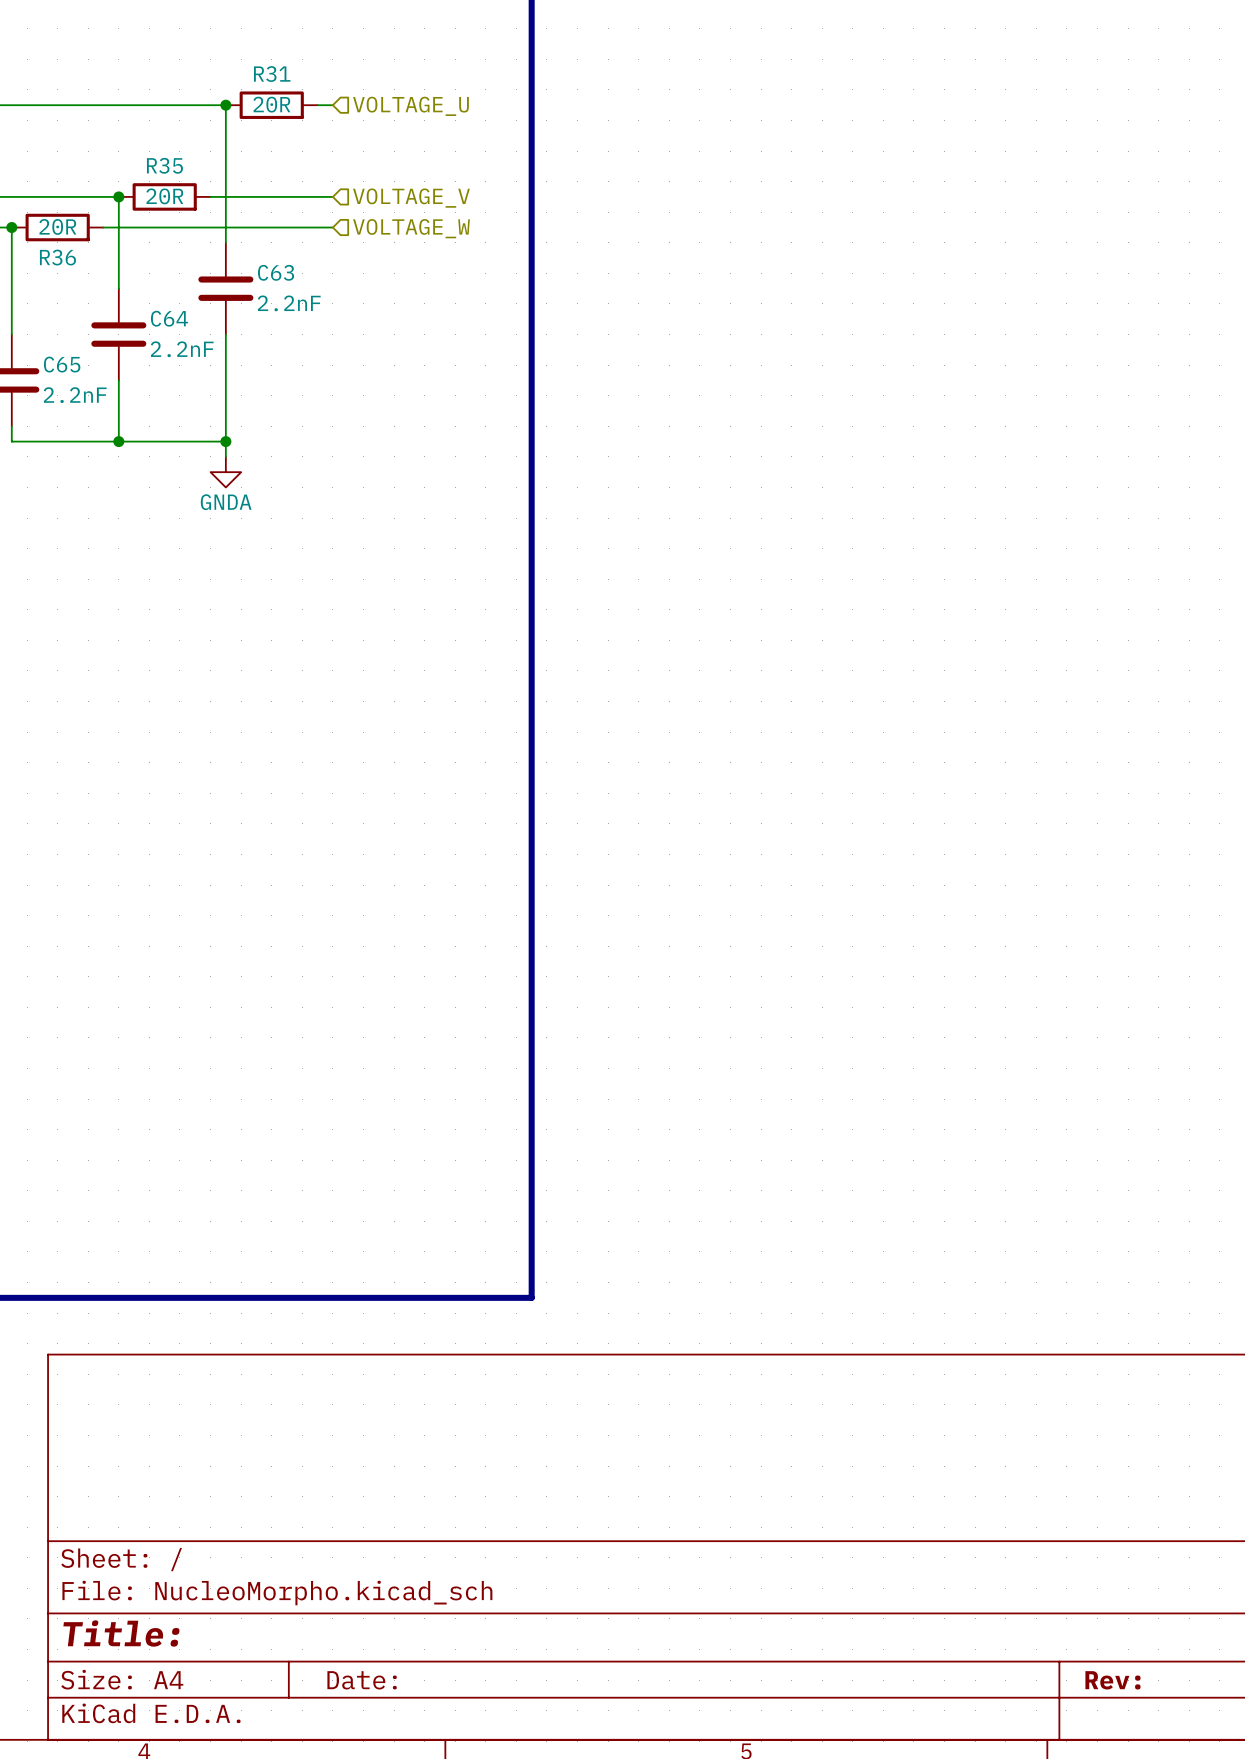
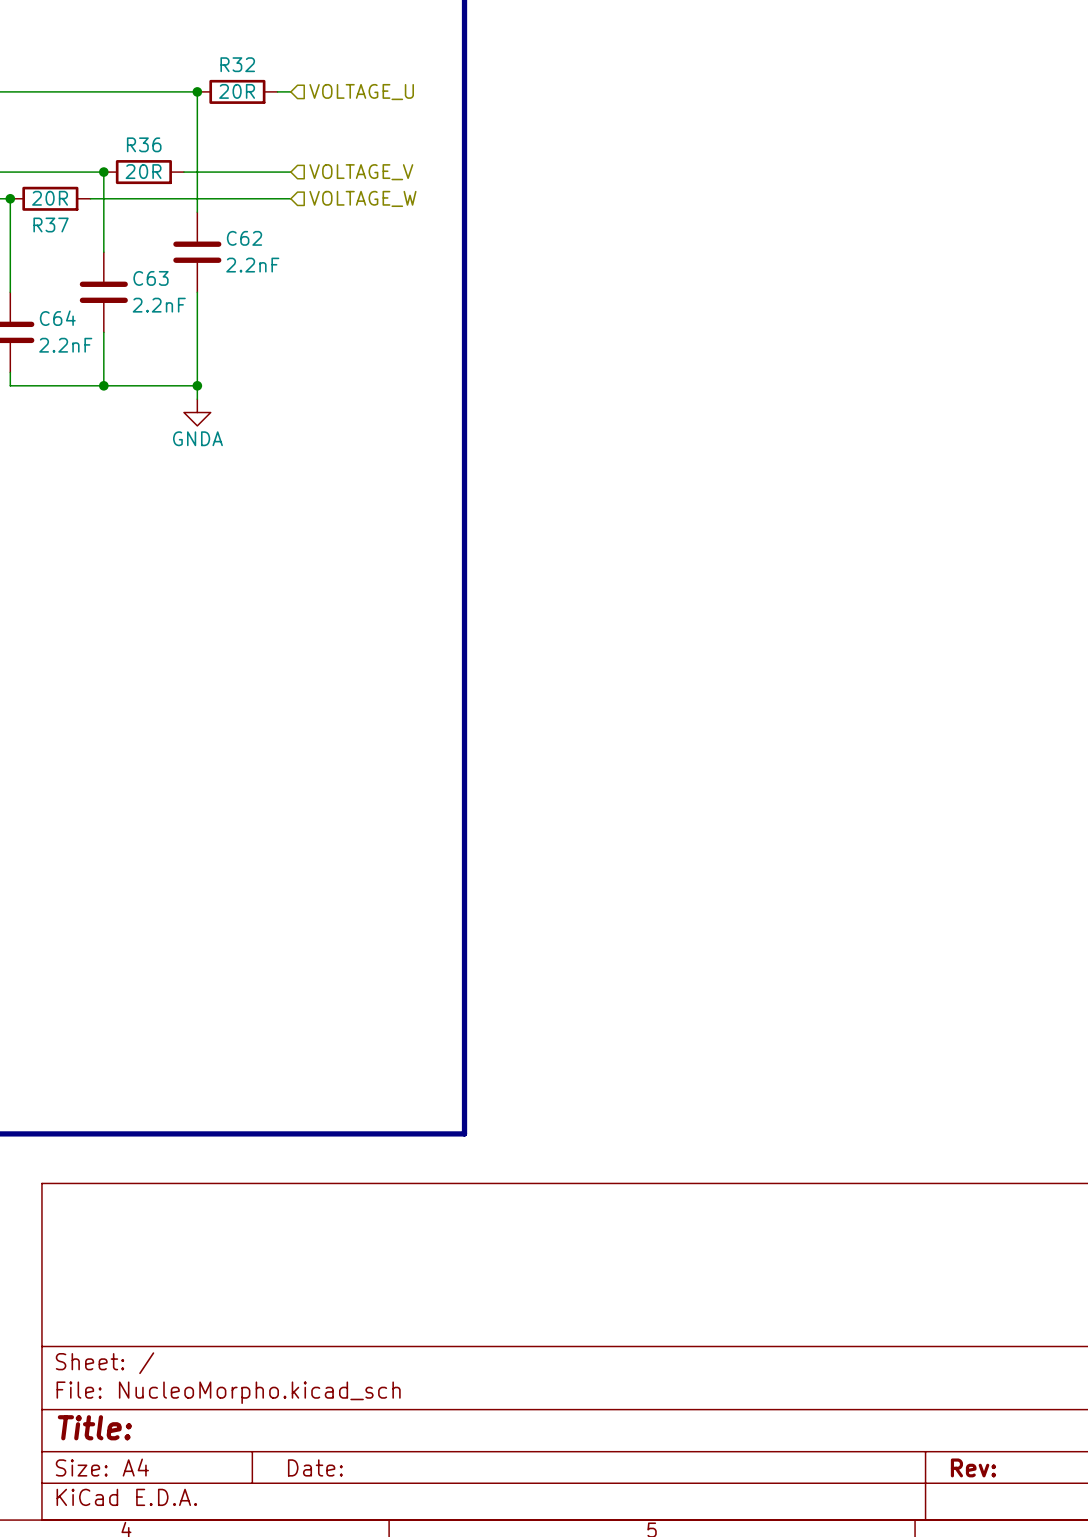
R31 name: R31 (272, 74) -> R32 (237, 64)
R35 name: R35 (164, 165) -> R36 (144, 144)
R36 name: R36 (57, 257) -> R37 (51, 225)
C63 name: C63 (276, 272) -> C62 (244, 238)
C64 name: C64 (169, 318) -> C63 (151, 278)
C65 name: C65 (62, 364) -> C64 (57, 318)

